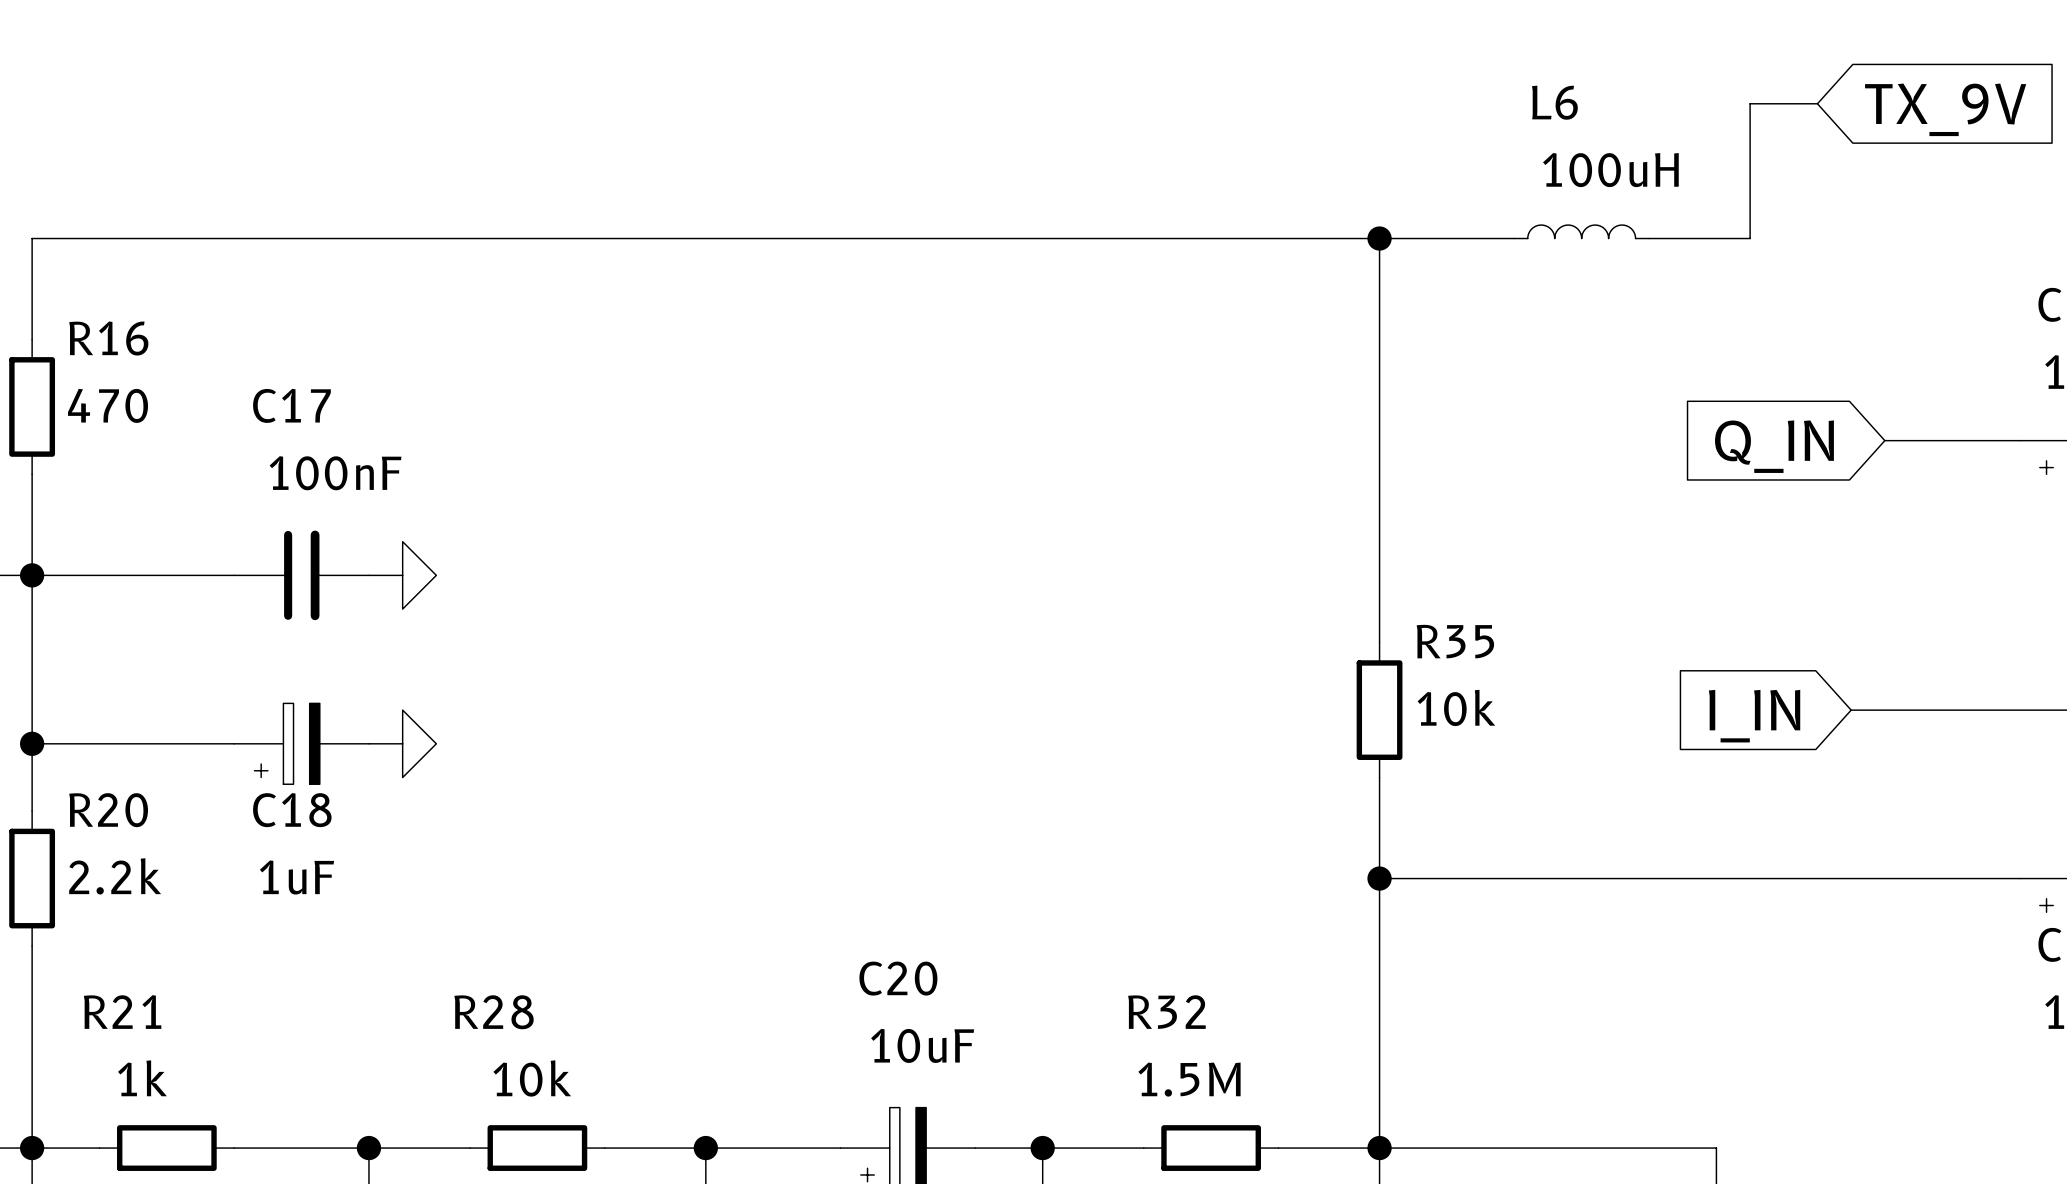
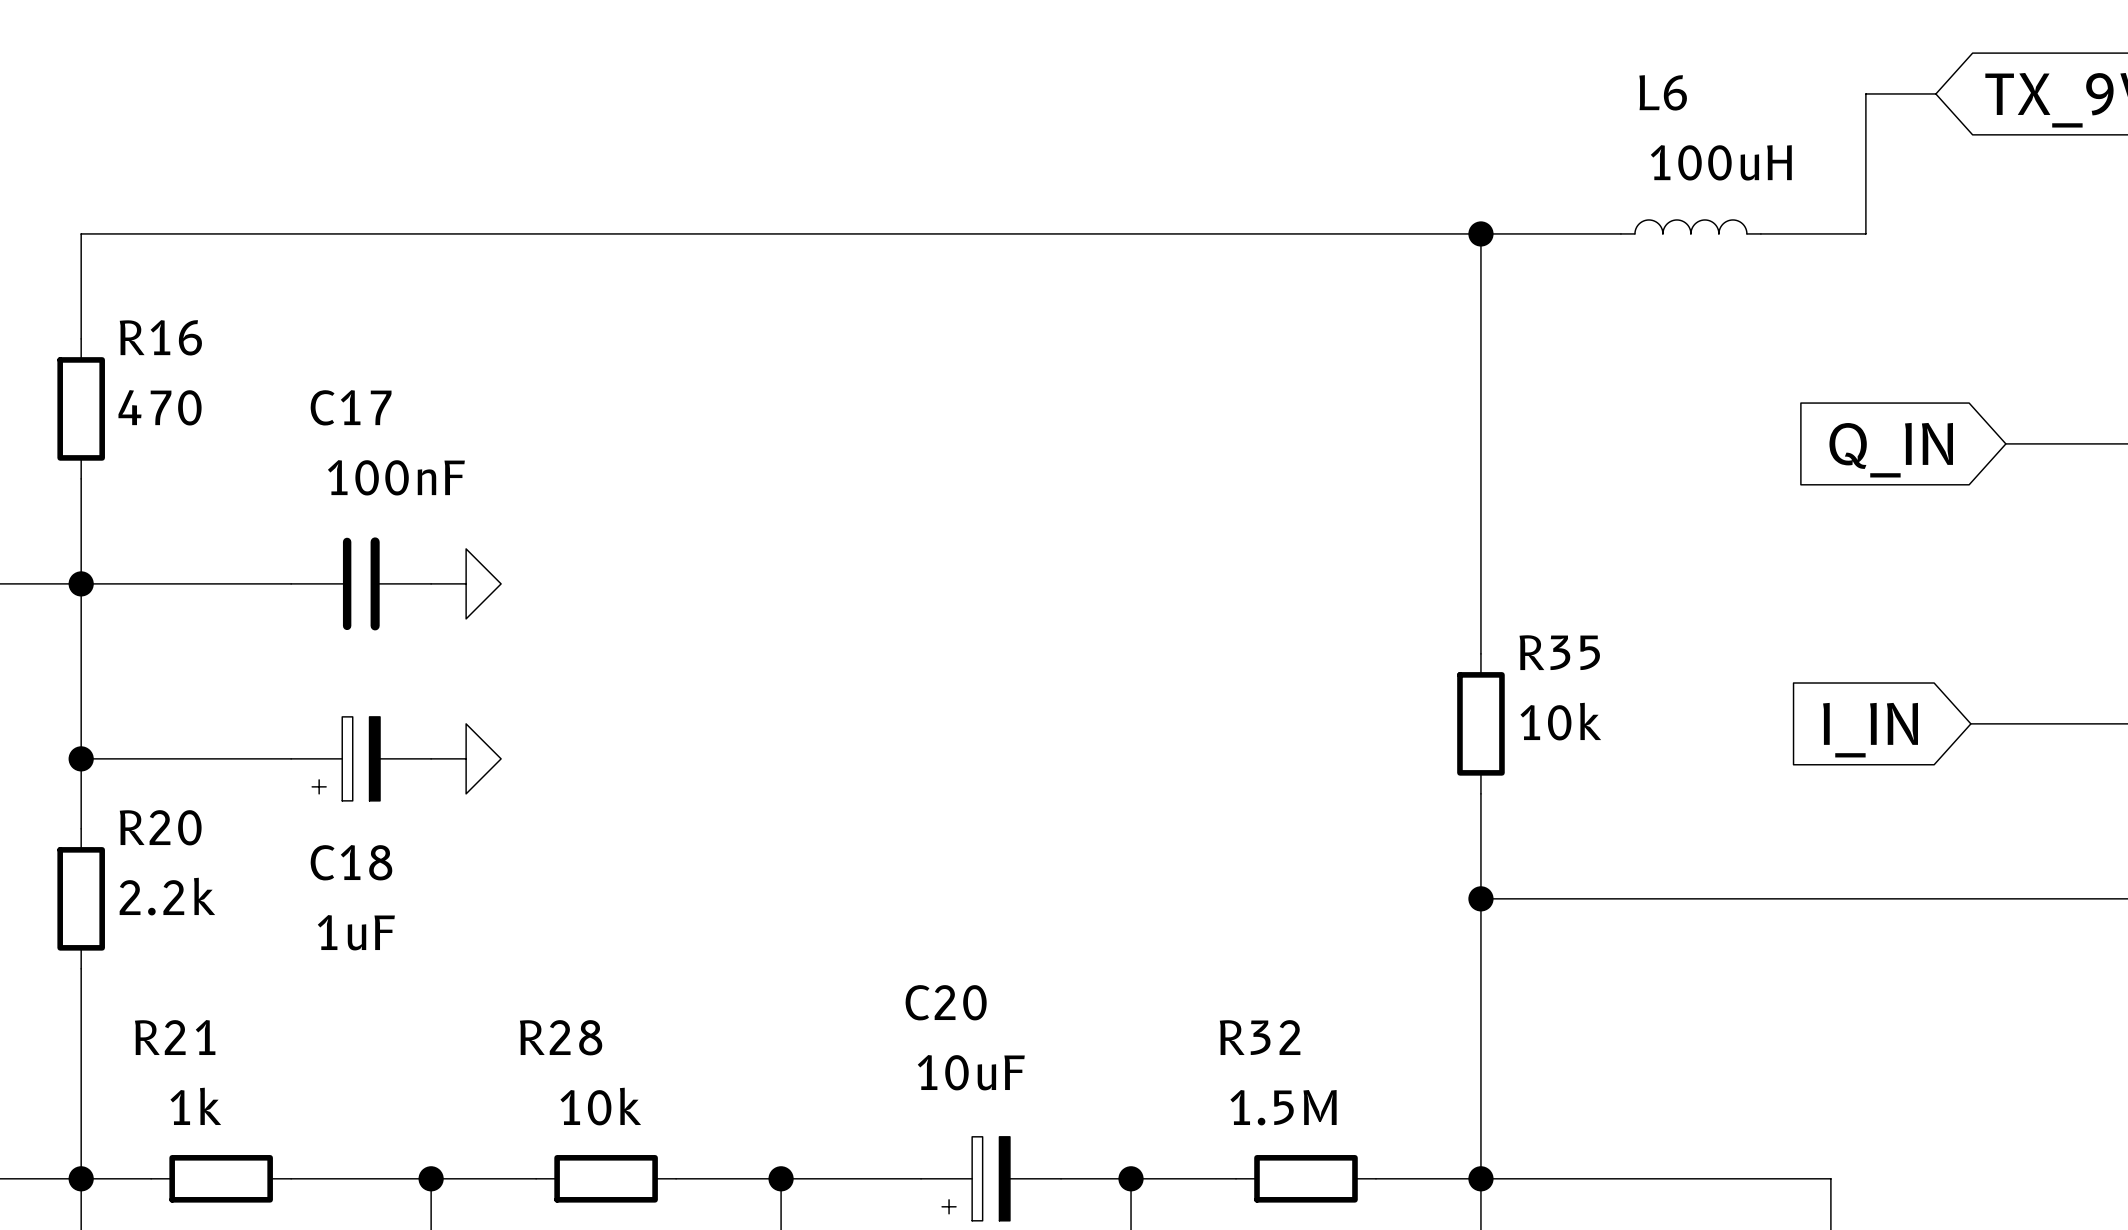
C18 name position: C18 (292, 810) -> C18 (351, 862)
C18 value position: 1uF (296, 877) -> 1uF (356, 932)
C20 name position: C20 (898, 978) -> C20 (946, 1002)
C20 value position: 10uF (922, 1045) -> 10uF (971, 1072)

